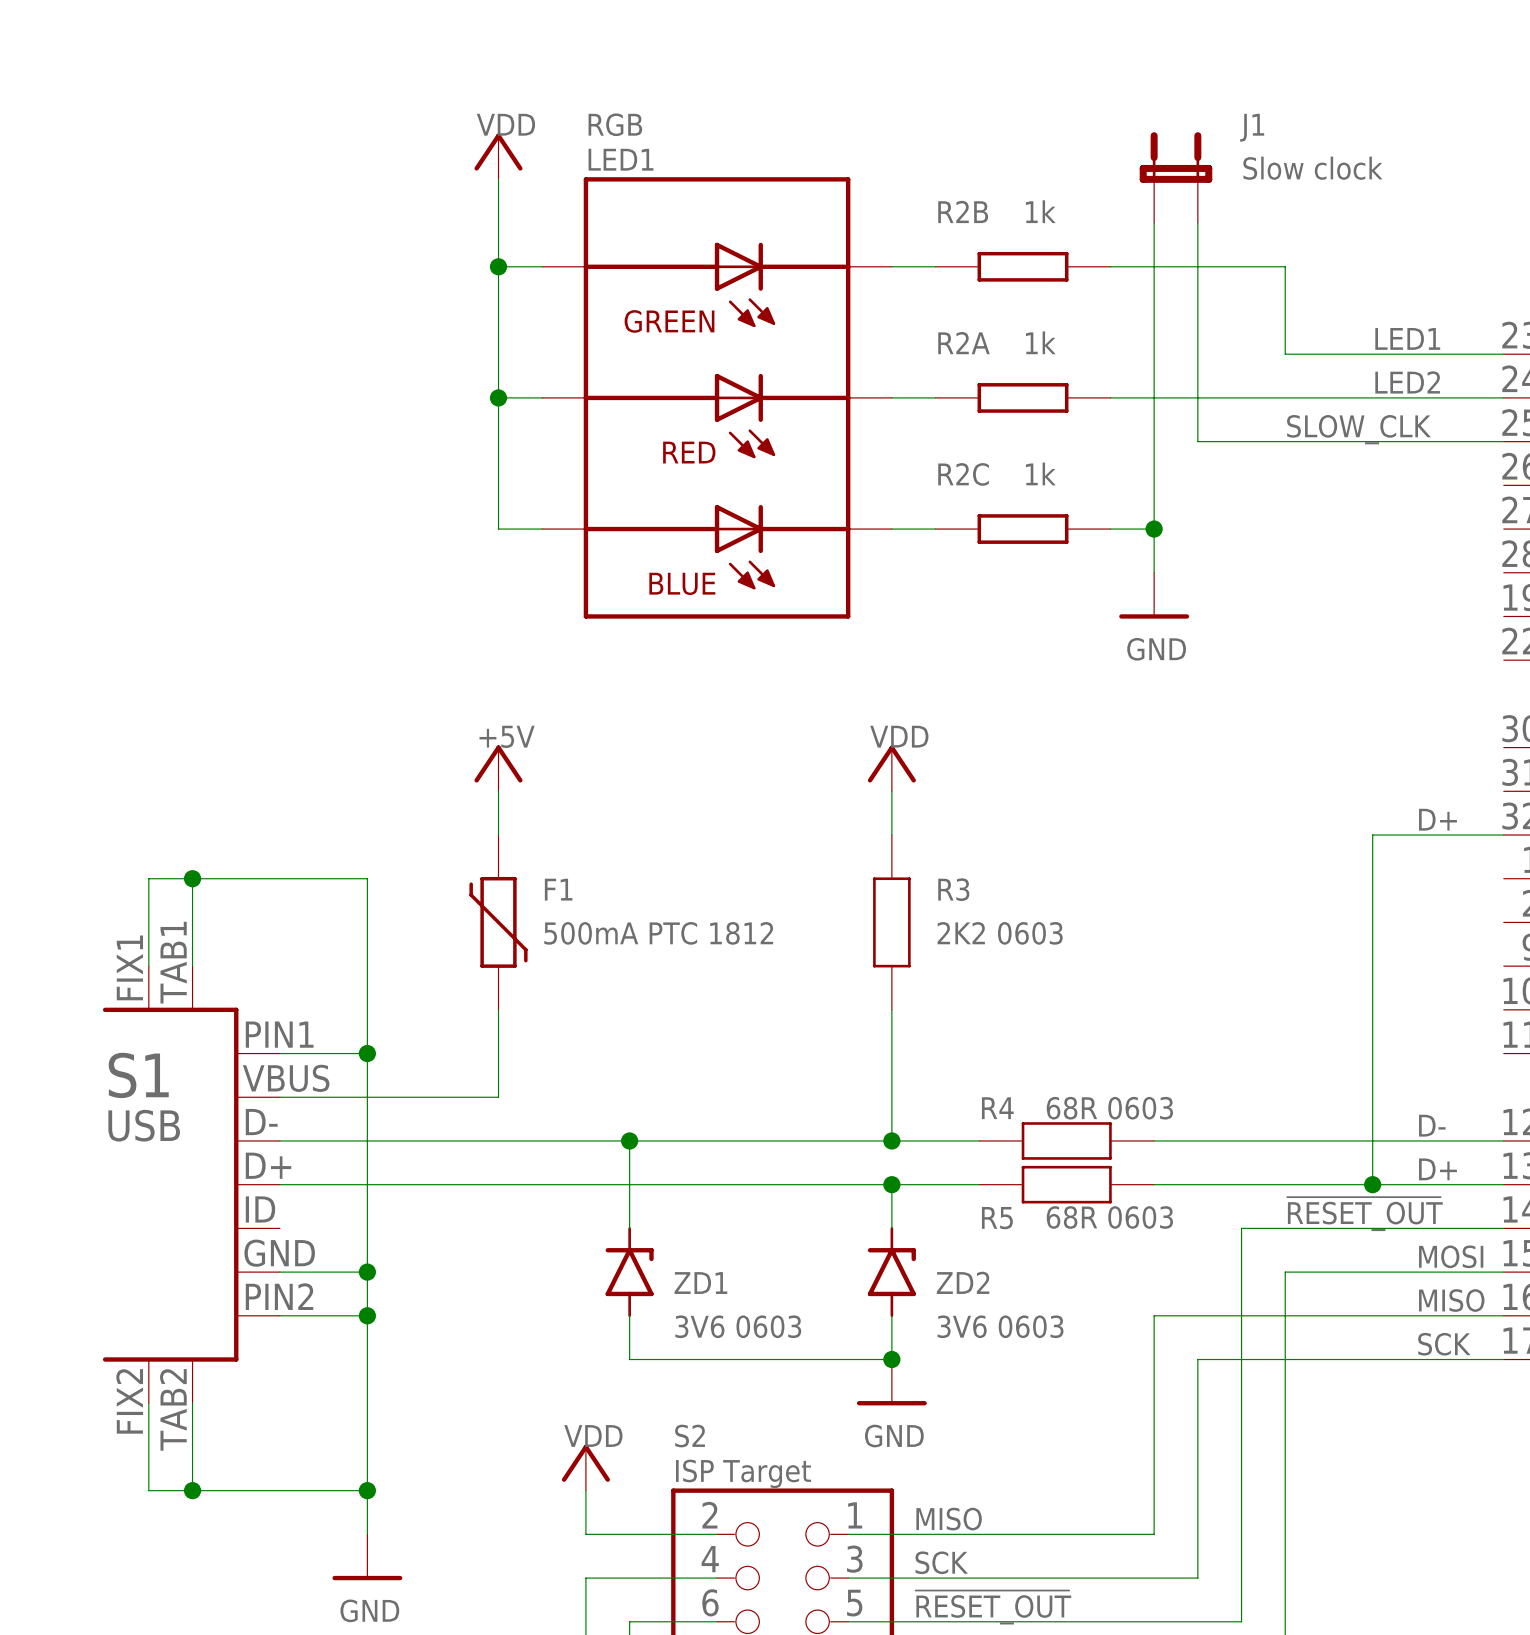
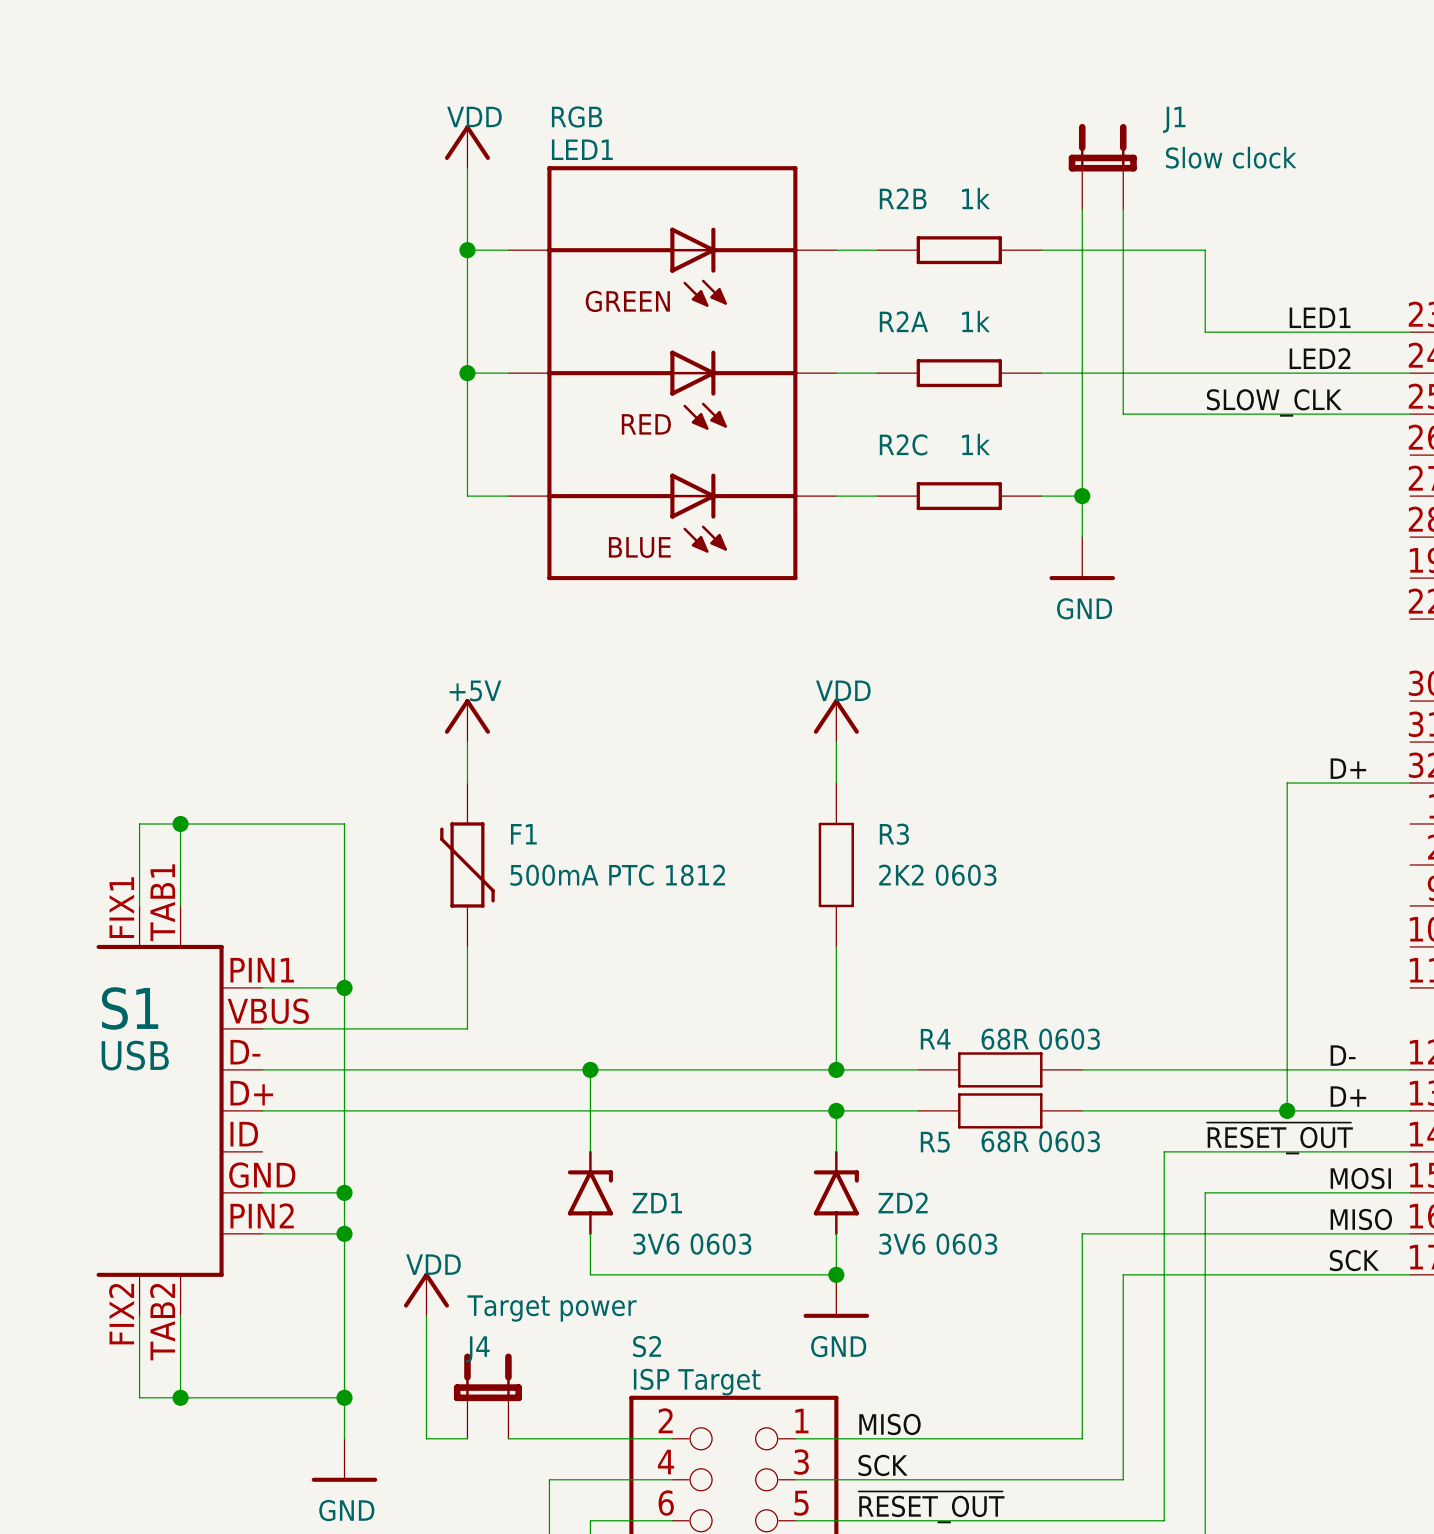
wire: none -> (426, 1315) (426, 1438) (467, 1438)
power symbol position: VDD (585, 1467) -> VDD (426, 1294)
J4: none -> Target power (487, 1396)
wire: (585, 1490) (585, 1534) -> (508, 1438) (549, 1438)

